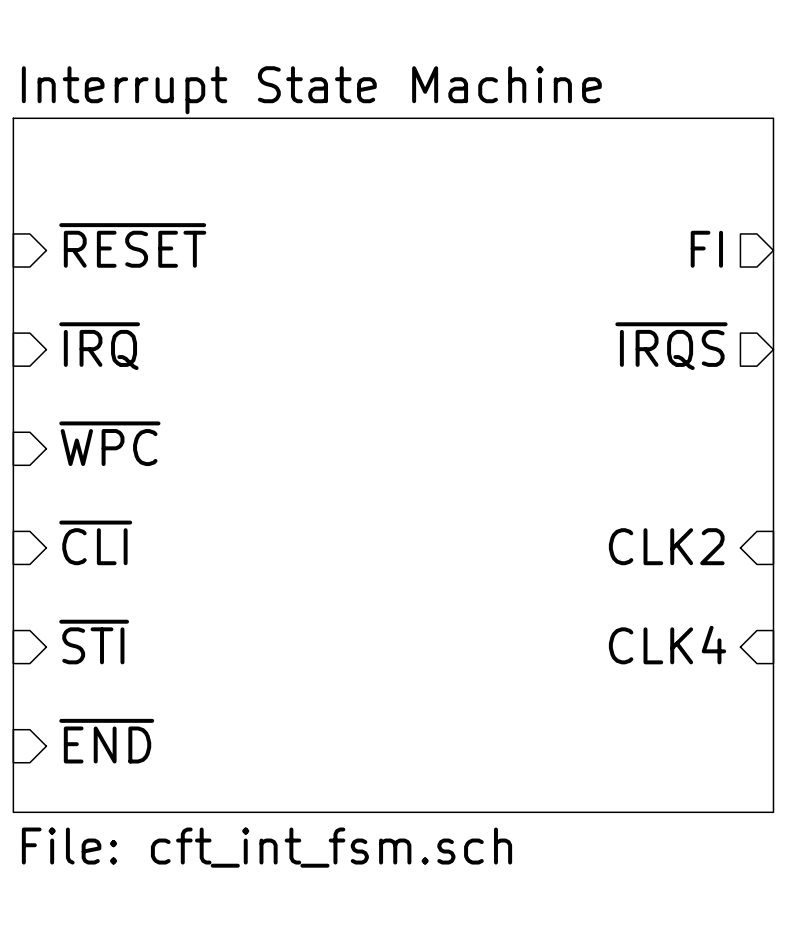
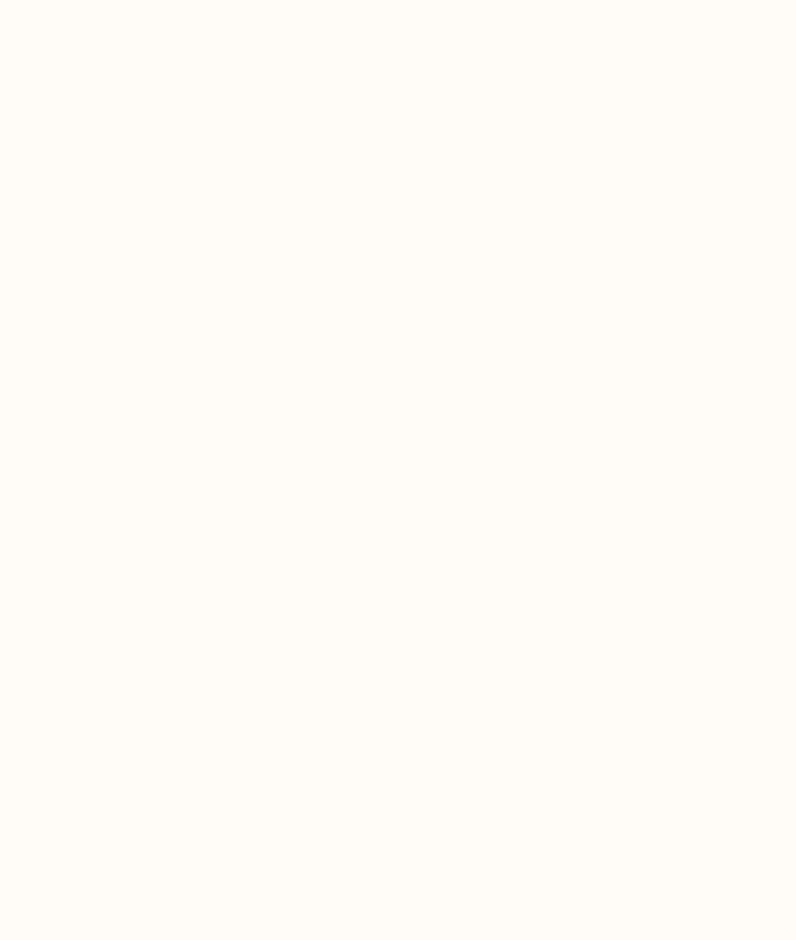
sheet pin: ~{RESET} (132, 245) -> none
sheet pin: FI (706, 249) -> none
sheet pin: ~{IRQ} (99, 346) -> none
sheet pin: ~{IRQS} (671, 346) -> none
sheet pin: ~{WPC} (109, 443) -> none
sheet Interrupt State Machine: File: cft_int_fsm.sch (393, 465) -> none
sheet pin: ~{CLI} (95, 542) -> none
sheet pin: CLK2 (666, 546) -> none
sheet pin: ~{STI} (94, 642) -> none
sheet pin: CLK4 (667, 645) -> none
sheet pin: ~{END} (106, 741) -> none

